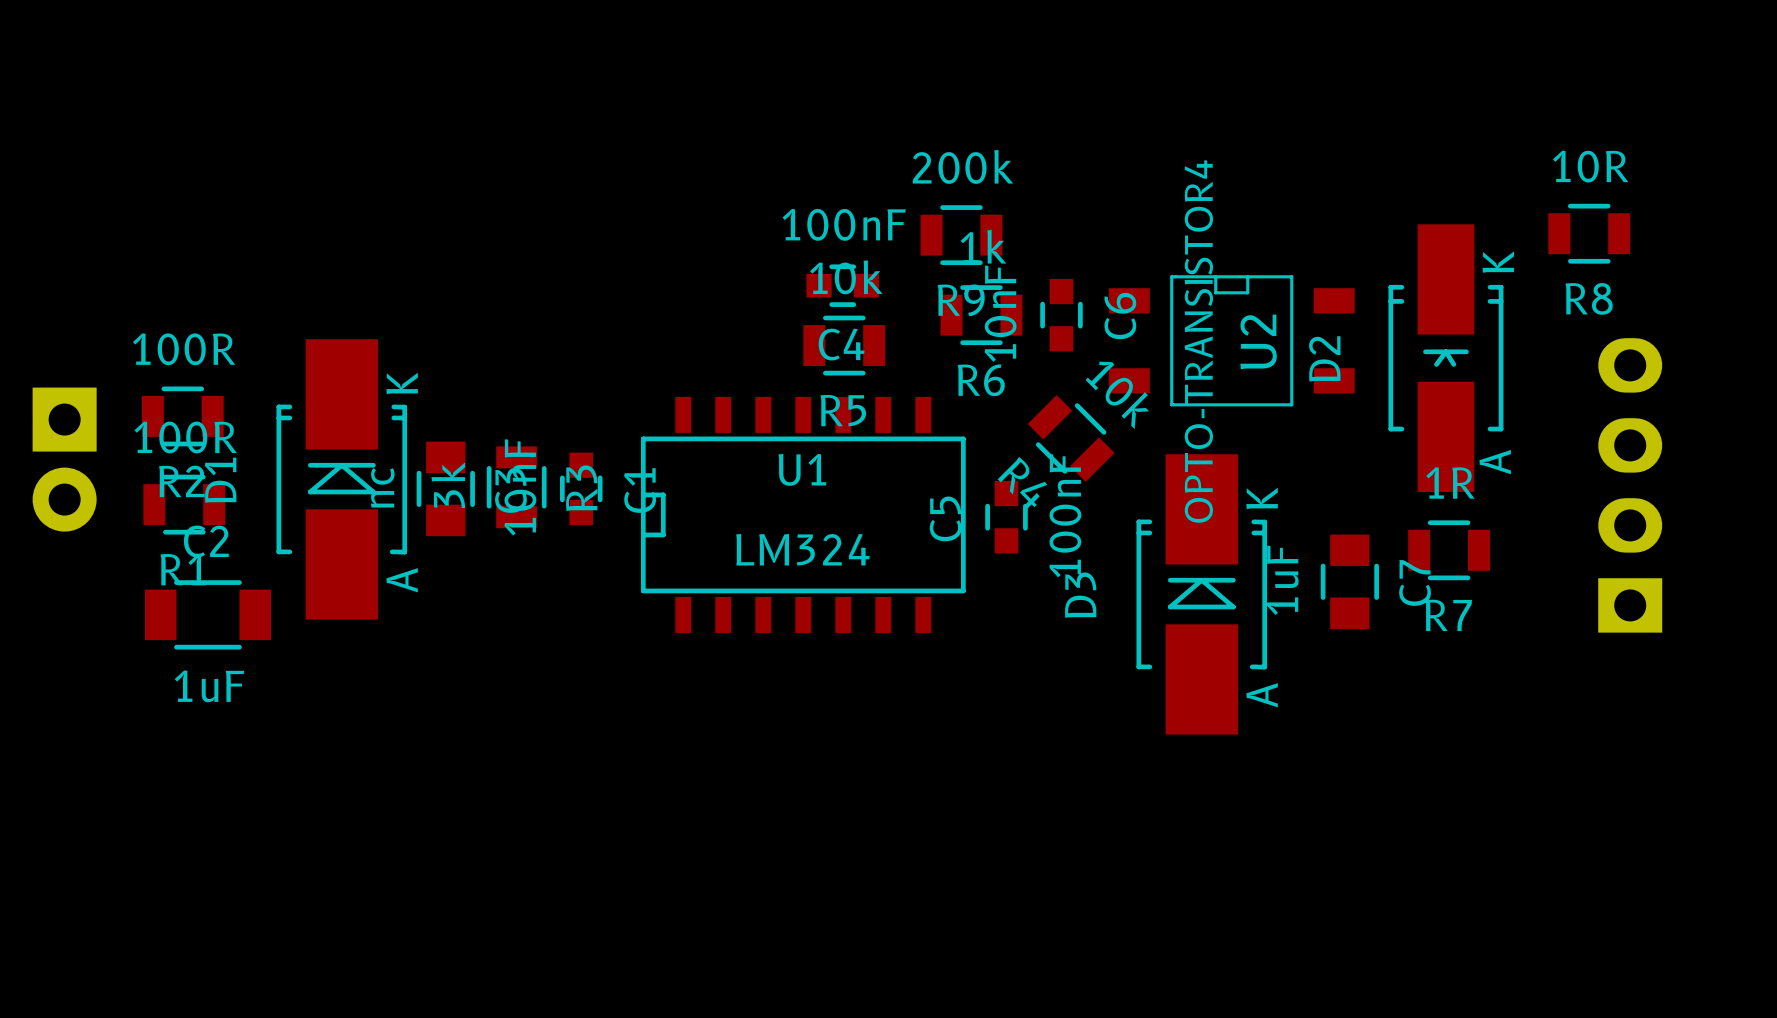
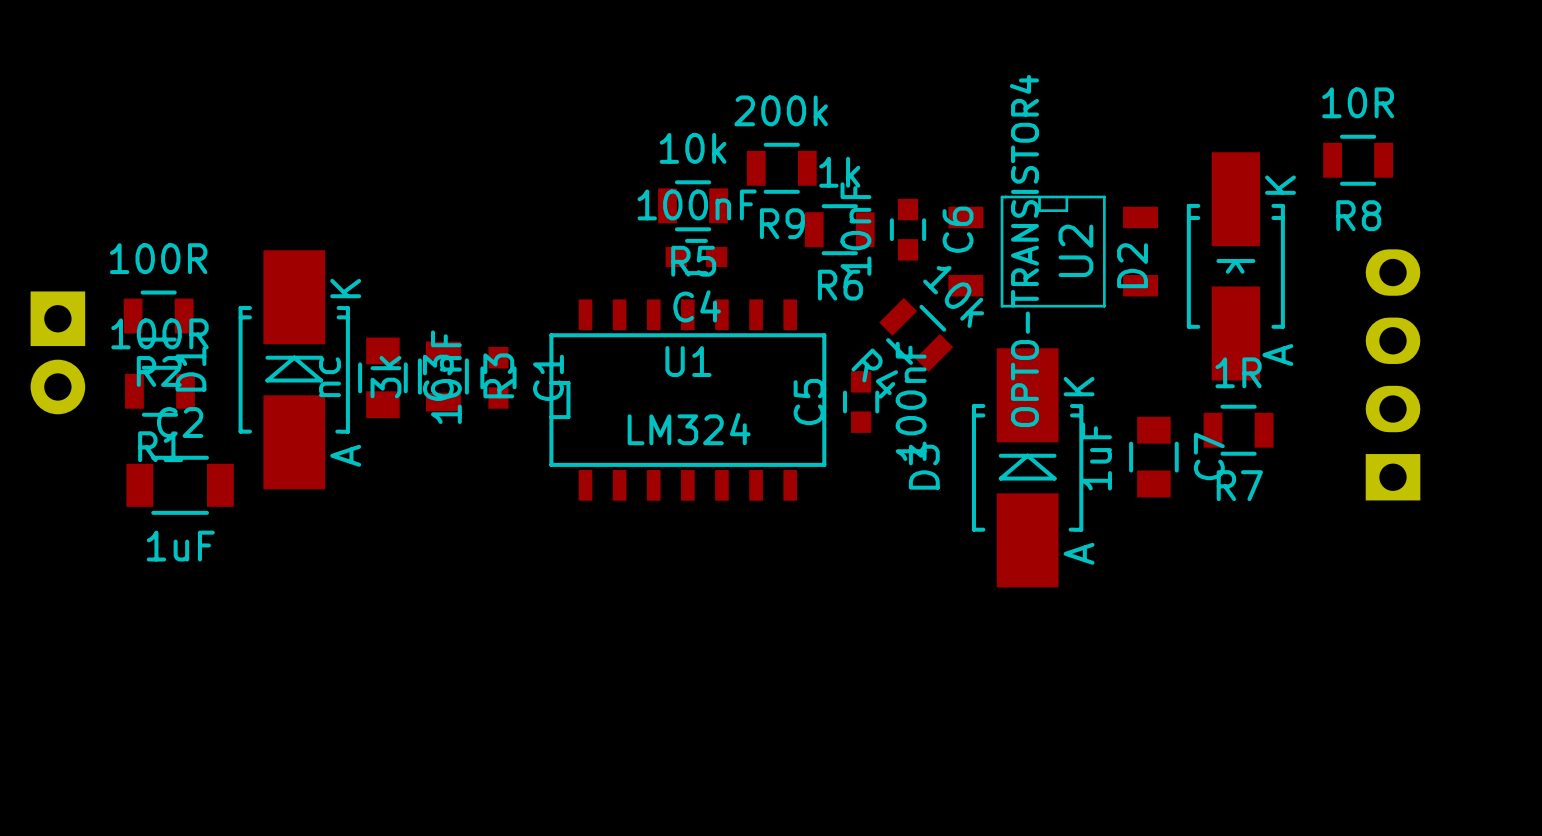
R9 position: (961, 235) -> (781, 168)
C4 position: (842, 285) -> (696, 256)
R5 position: (844, 345) -> (693, 205)

